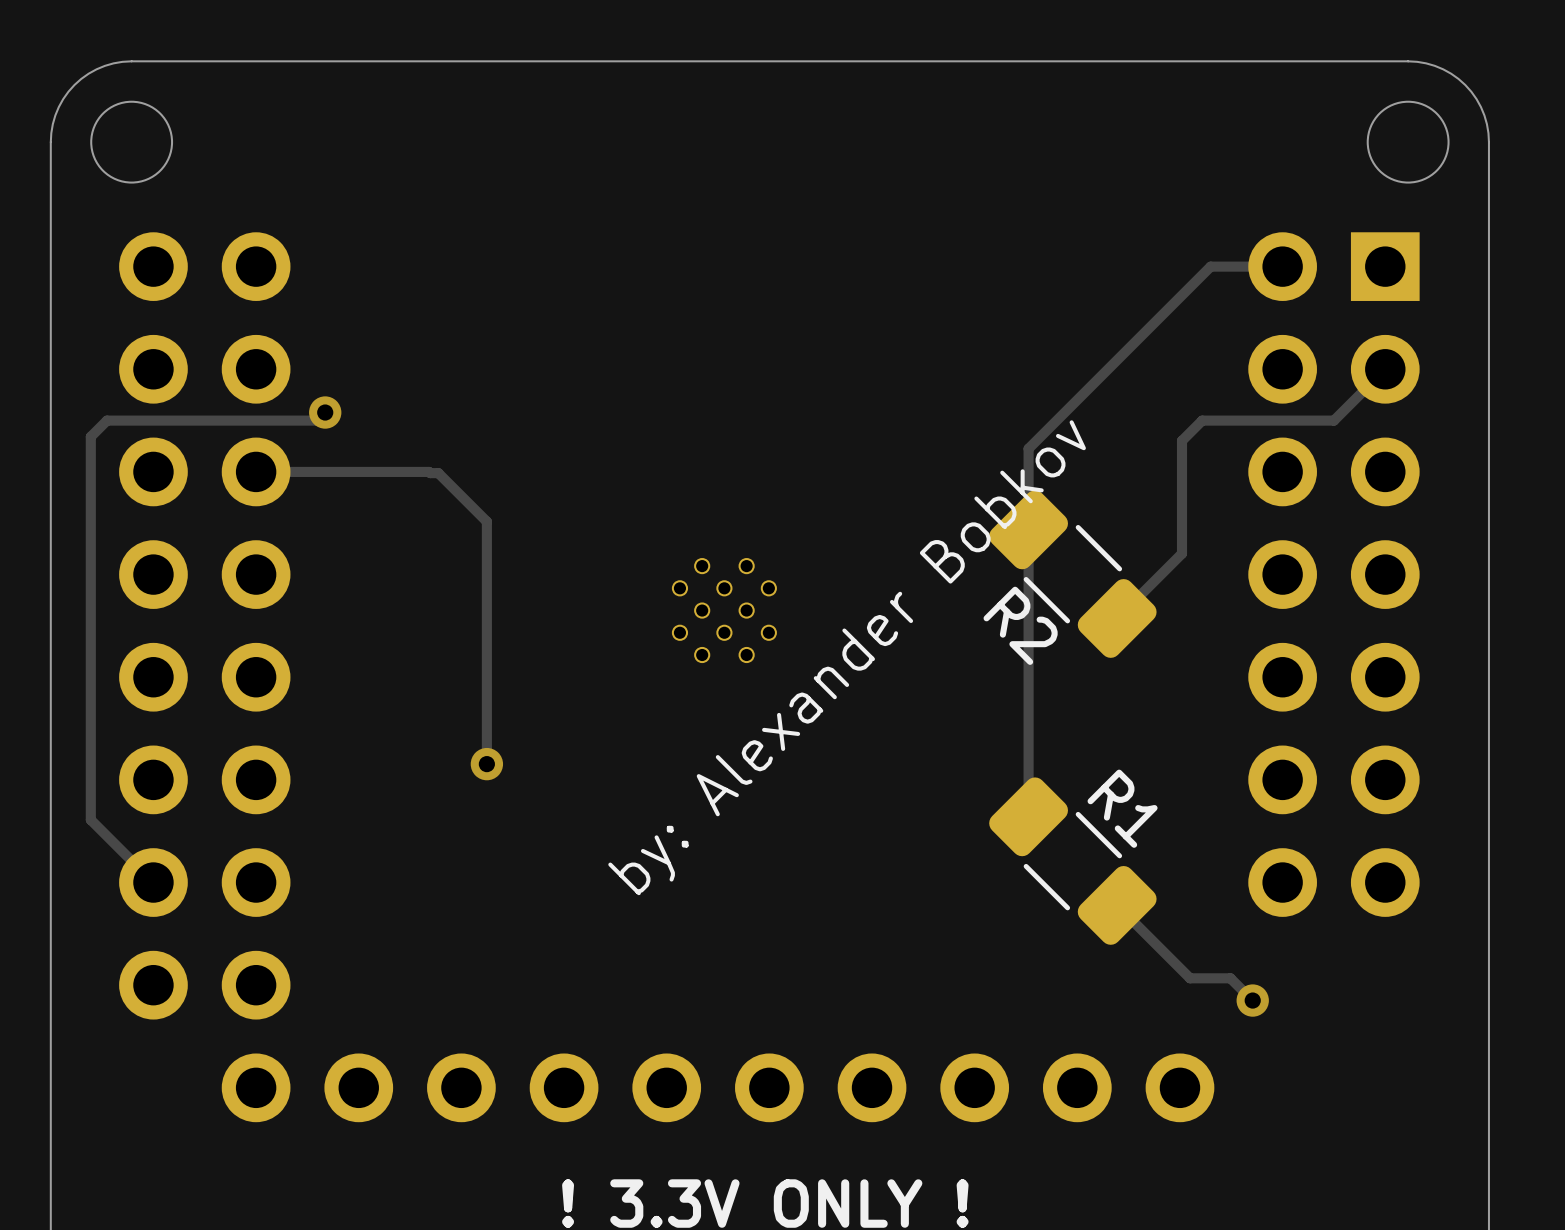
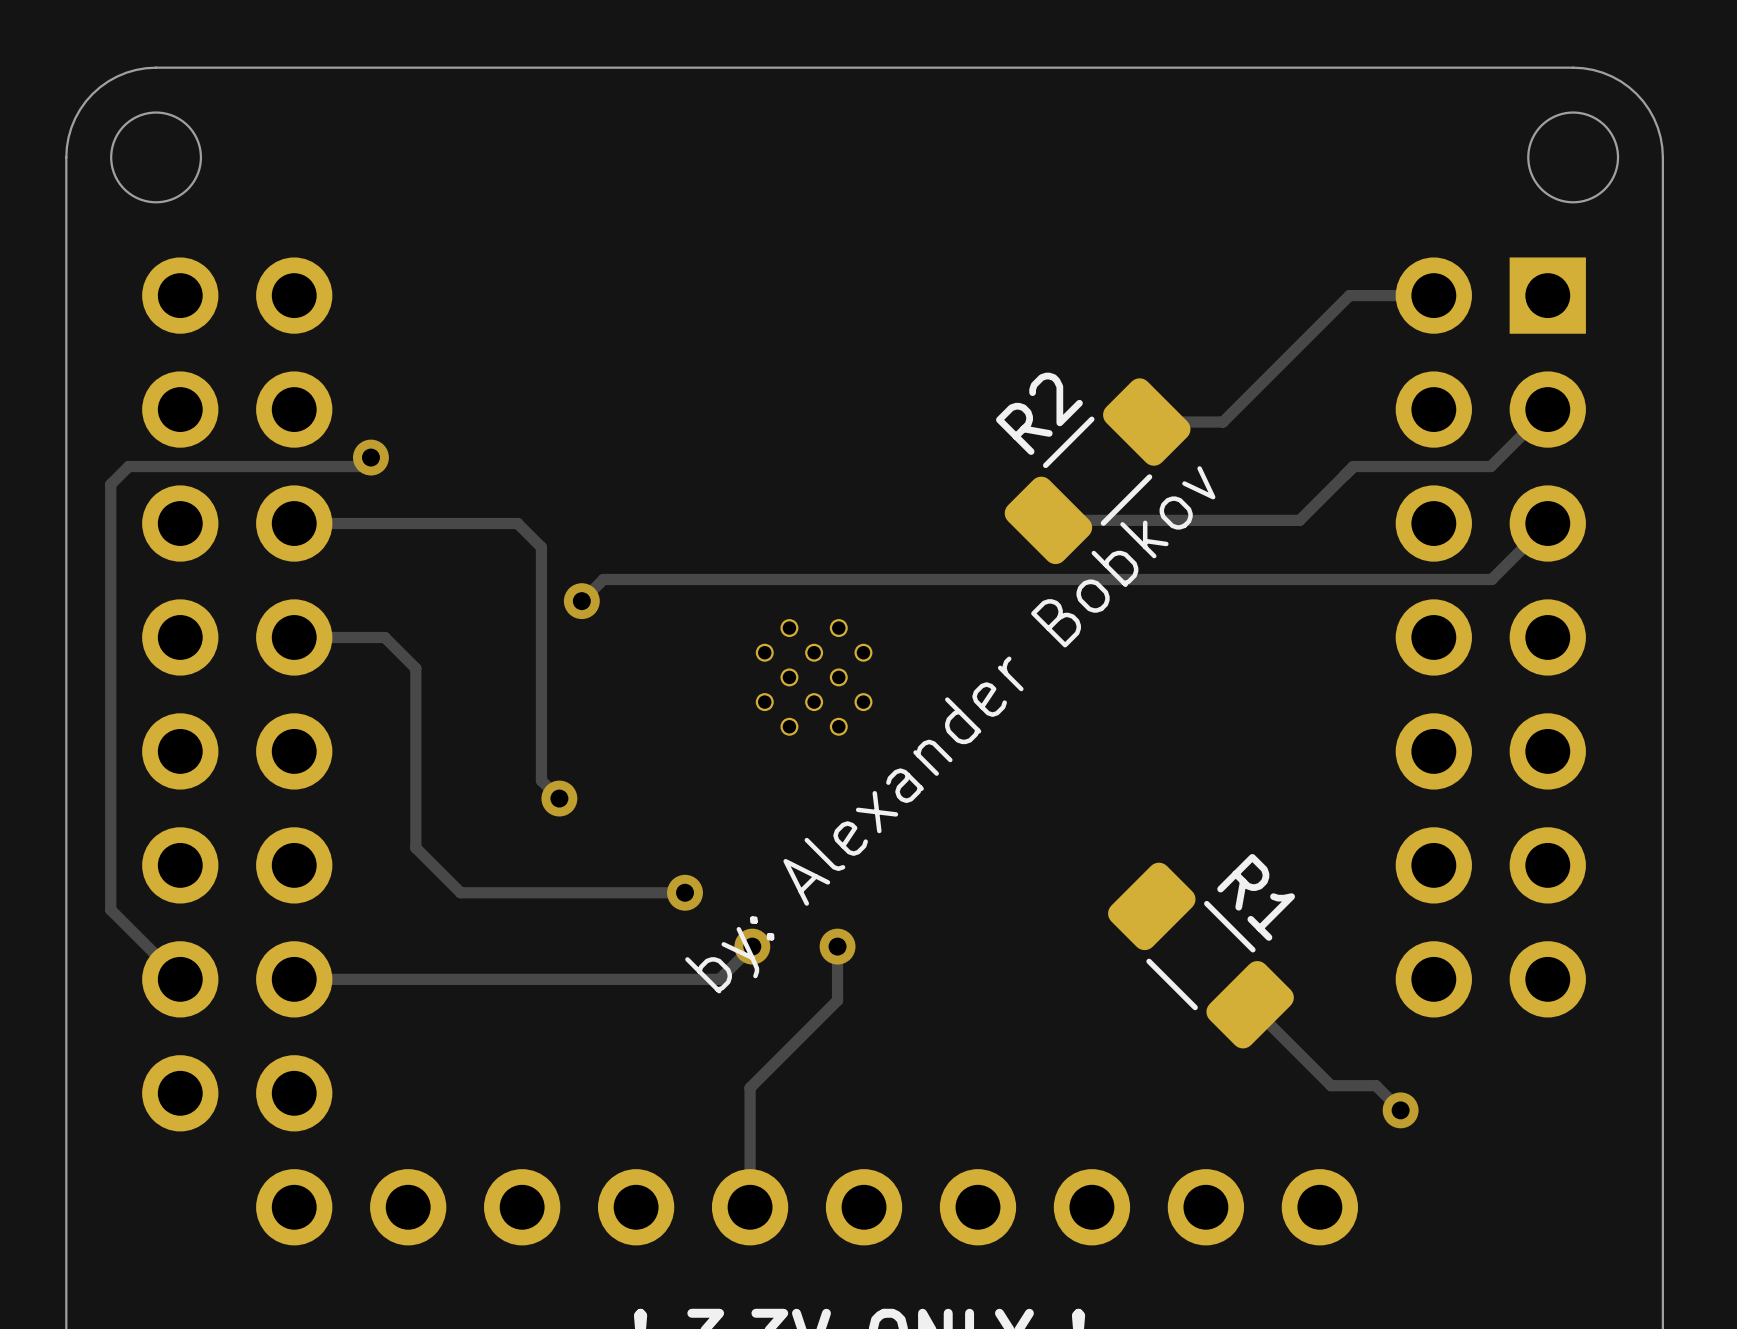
track: (1210, 266) (1028, 448) (1028, 816) -> (1353, 295) (1349, 295) (1223, 422) (1146, 422)
track: (1210, 420) (1202, 420) (1182, 440) (1182, 553) (1117, 618) -> (1353, 466) (1299, 520) (1048, 520)
track: (429, 471) (438, 473) (486, 521) (486, 764) -> (486, 523) (517, 523) (541, 547) (541, 780) (559, 798)
track: none -> (1547, 523) (1491, 579) (603, 579) (581, 601)
via: none -> (581, 601)
track: none -> (294, 637) (384, 637) (415, 668) (415, 847) (460, 892) (685, 892)
R2 rotation: 0° (1072, 574) -> 90° clockwise (1097, 471)
R2 position: (1072, 574) -> (1097, 471)
via position: (486, 764) -> (559, 798)
via: none -> (685, 892)
track: none -> (752, 946) (719, 979) (294, 979)
via: none -> (752, 946)
track: none -> (837, 946) (837, 1000) (750, 1087) (750, 1207)
via: none -> (837, 946)

